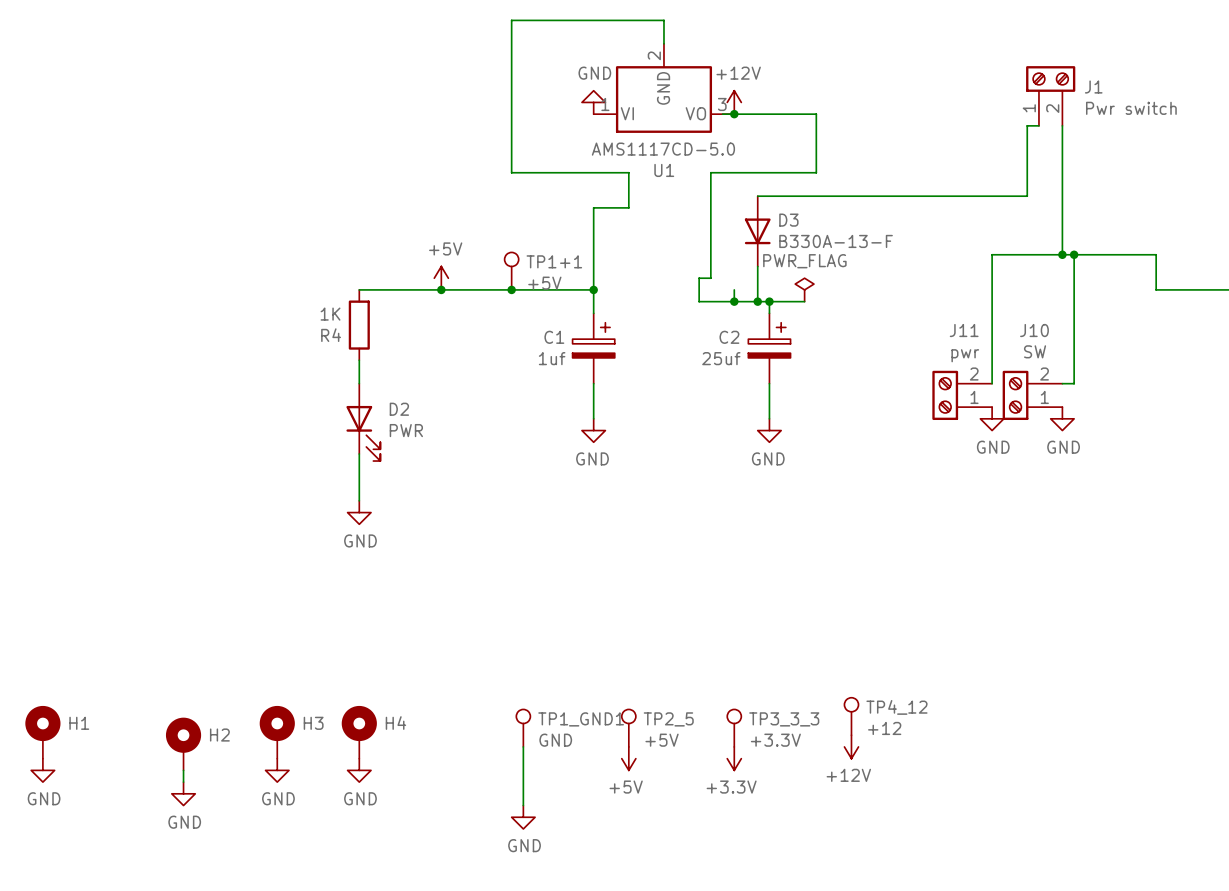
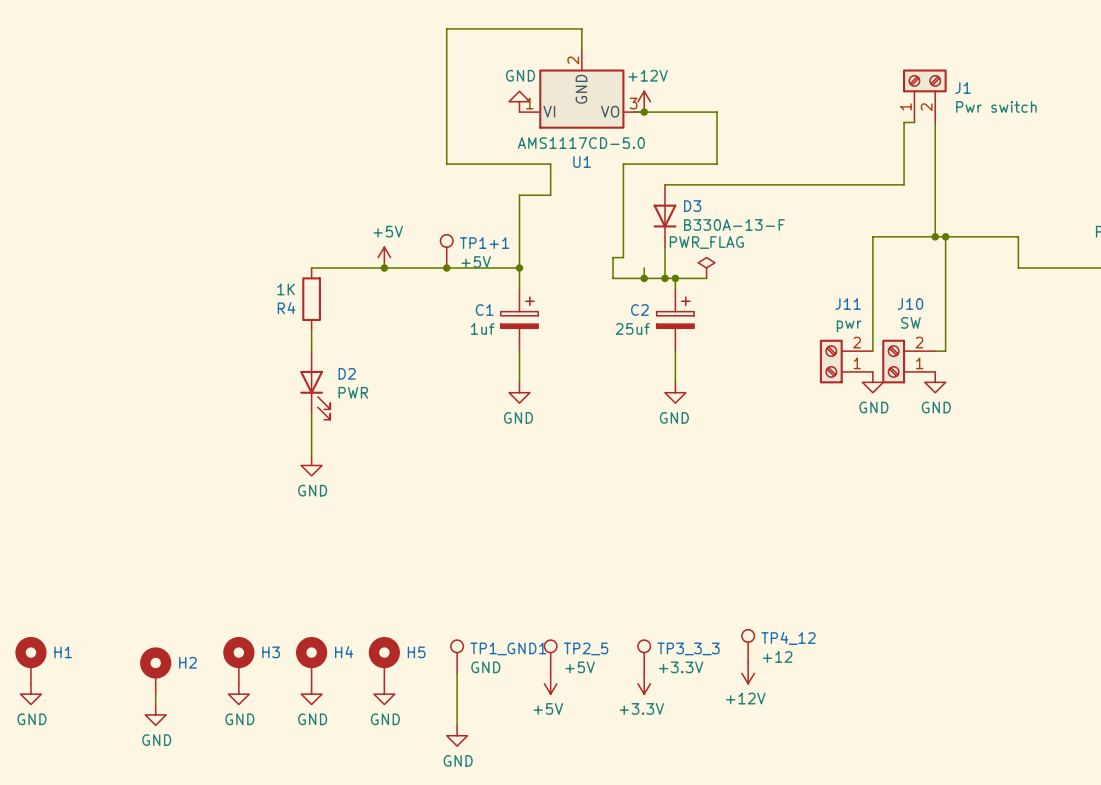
H5: none -> (384, 660)
power symbol: none -> GND (384, 694)

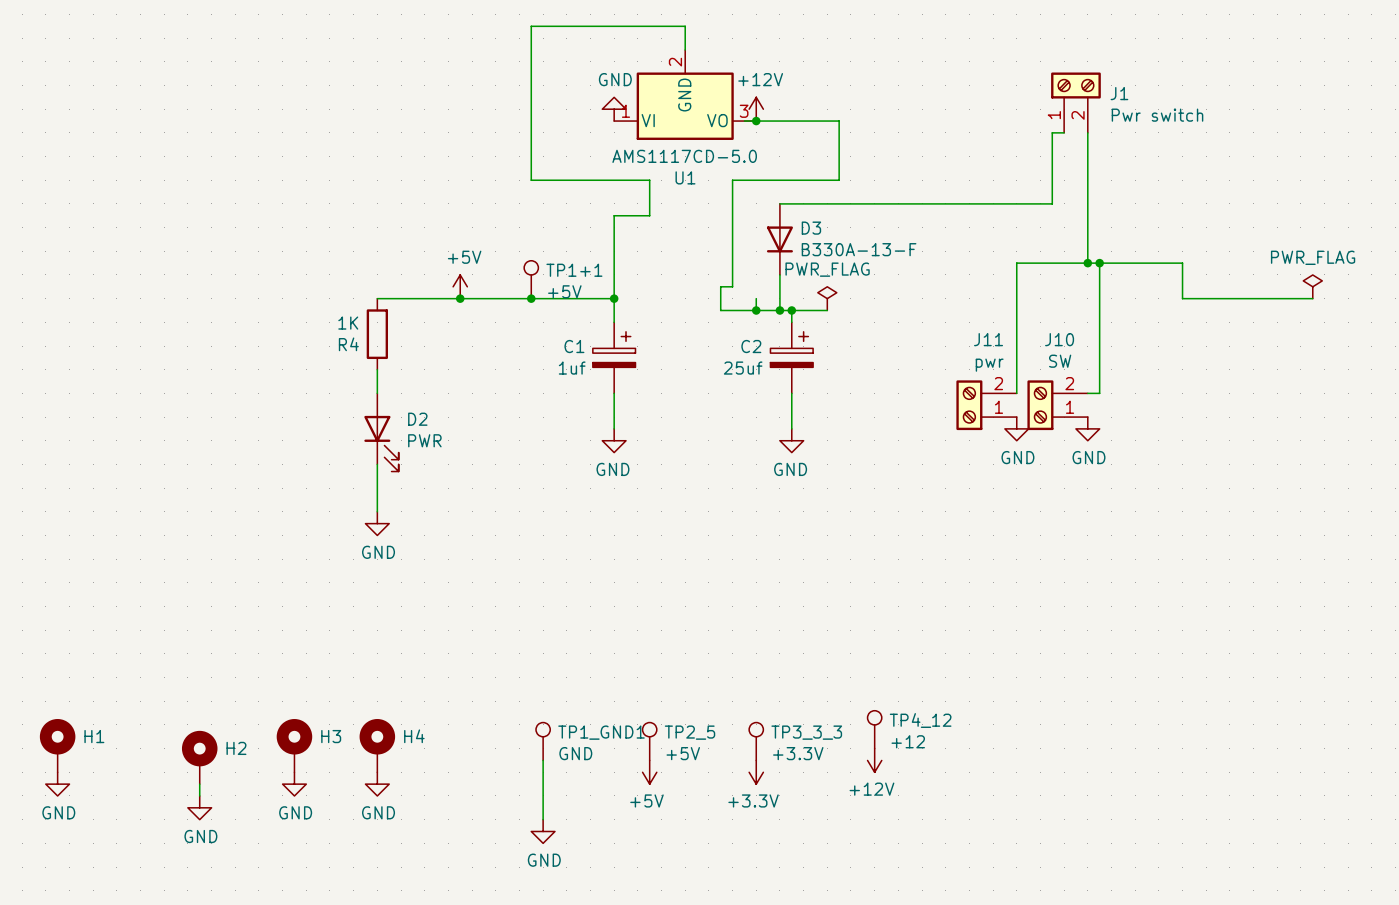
H5: (384, 660) -> none
power symbol: GND (384, 694) -> none

